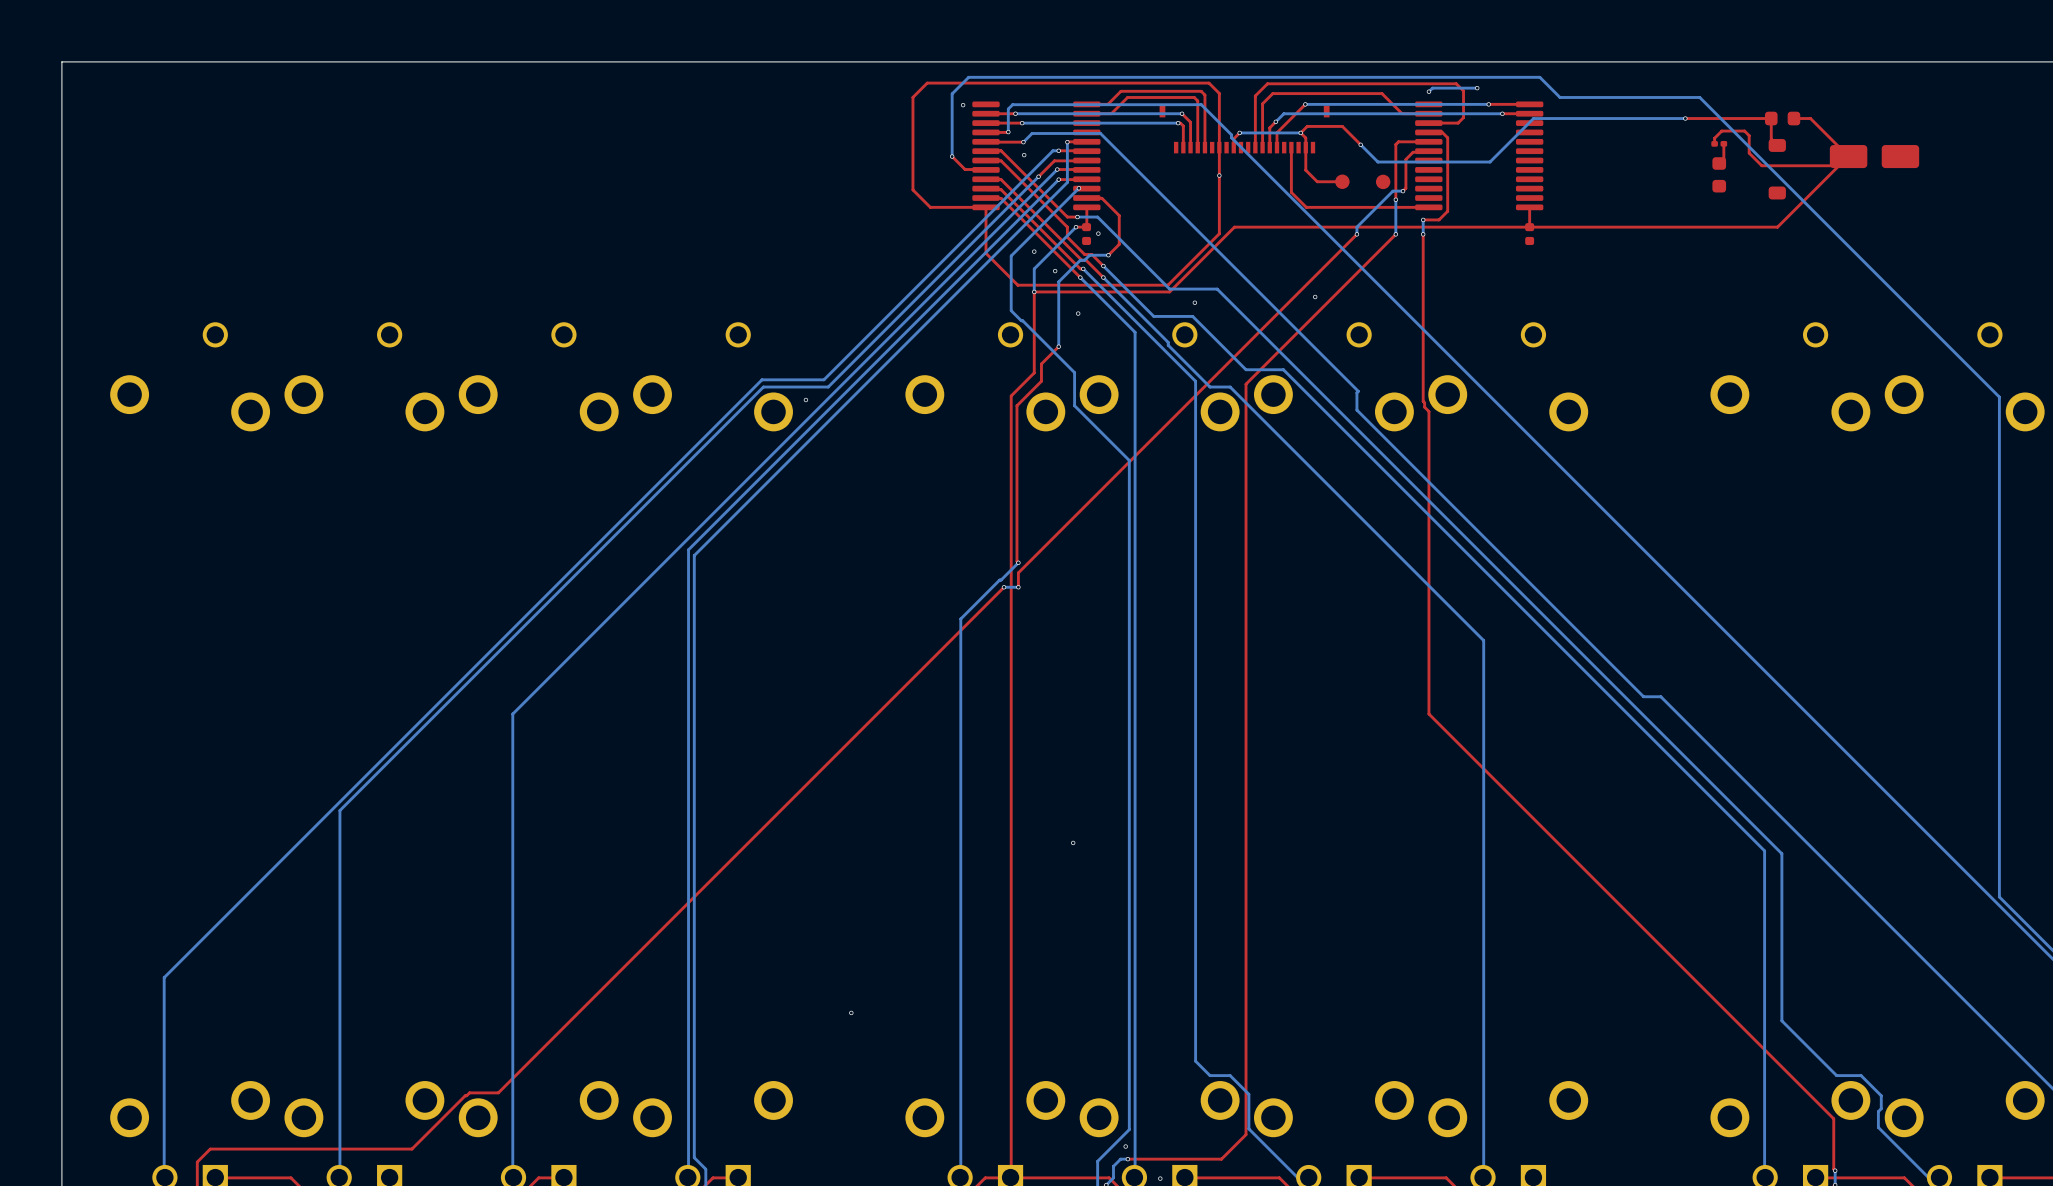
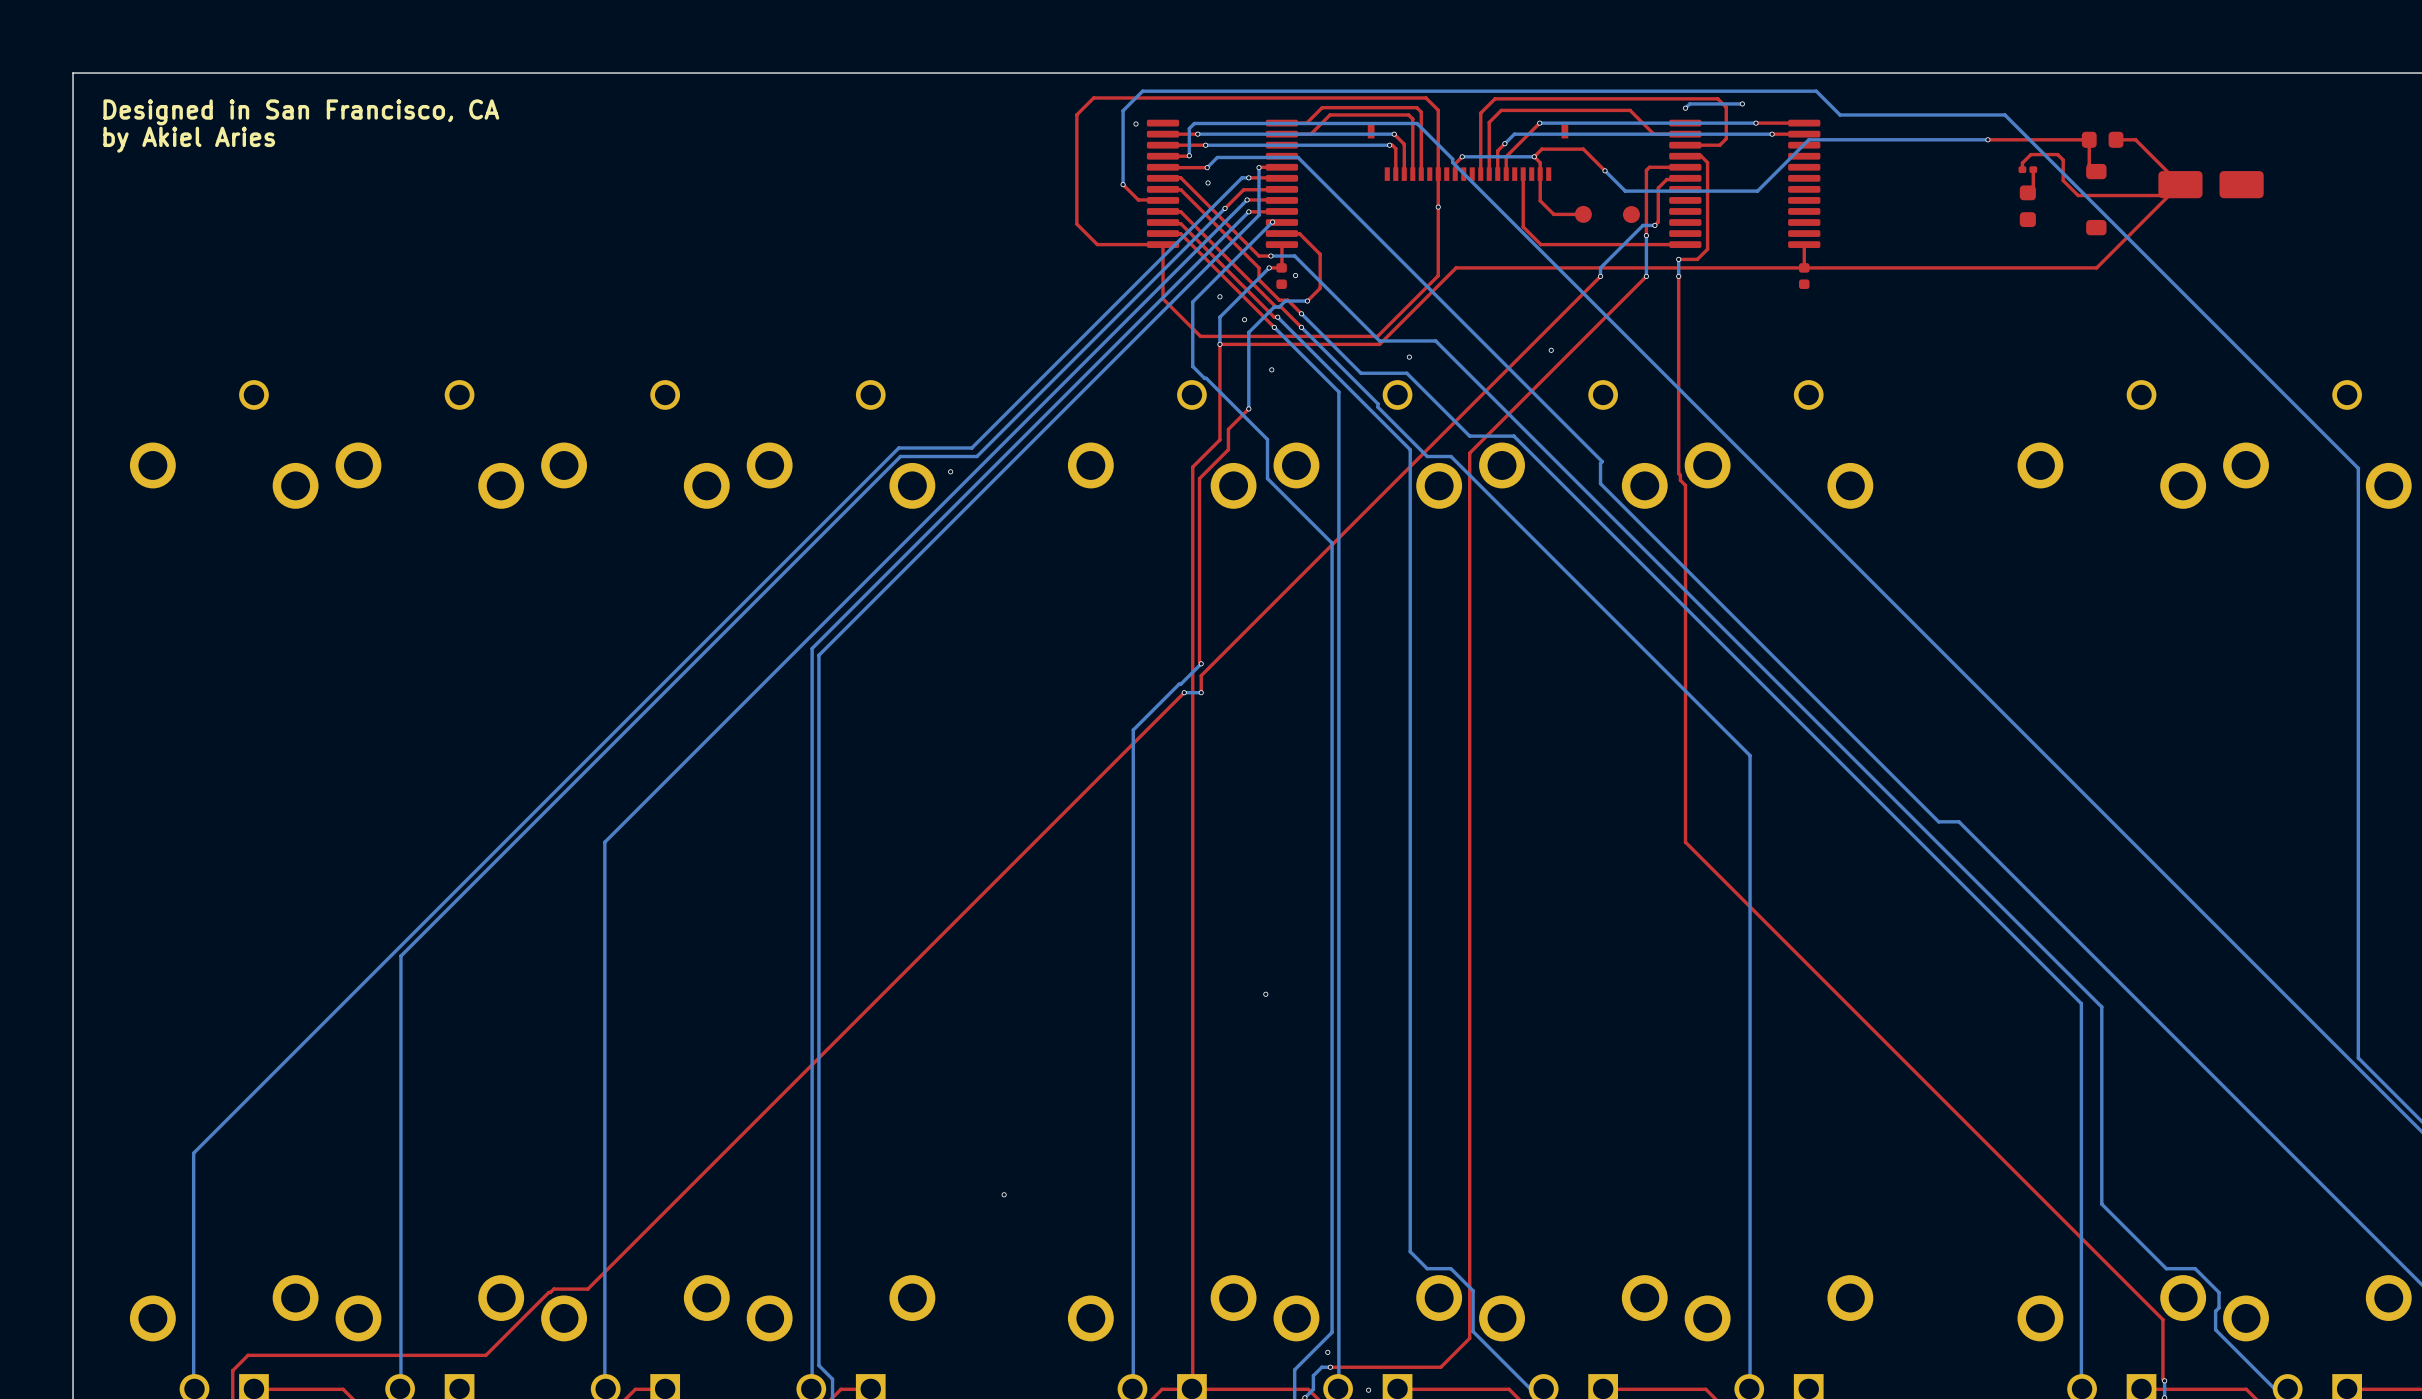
text: none -> Designed in San Francisco, CA (301, 112)
text: none -> by Akiel Aries (189, 139)

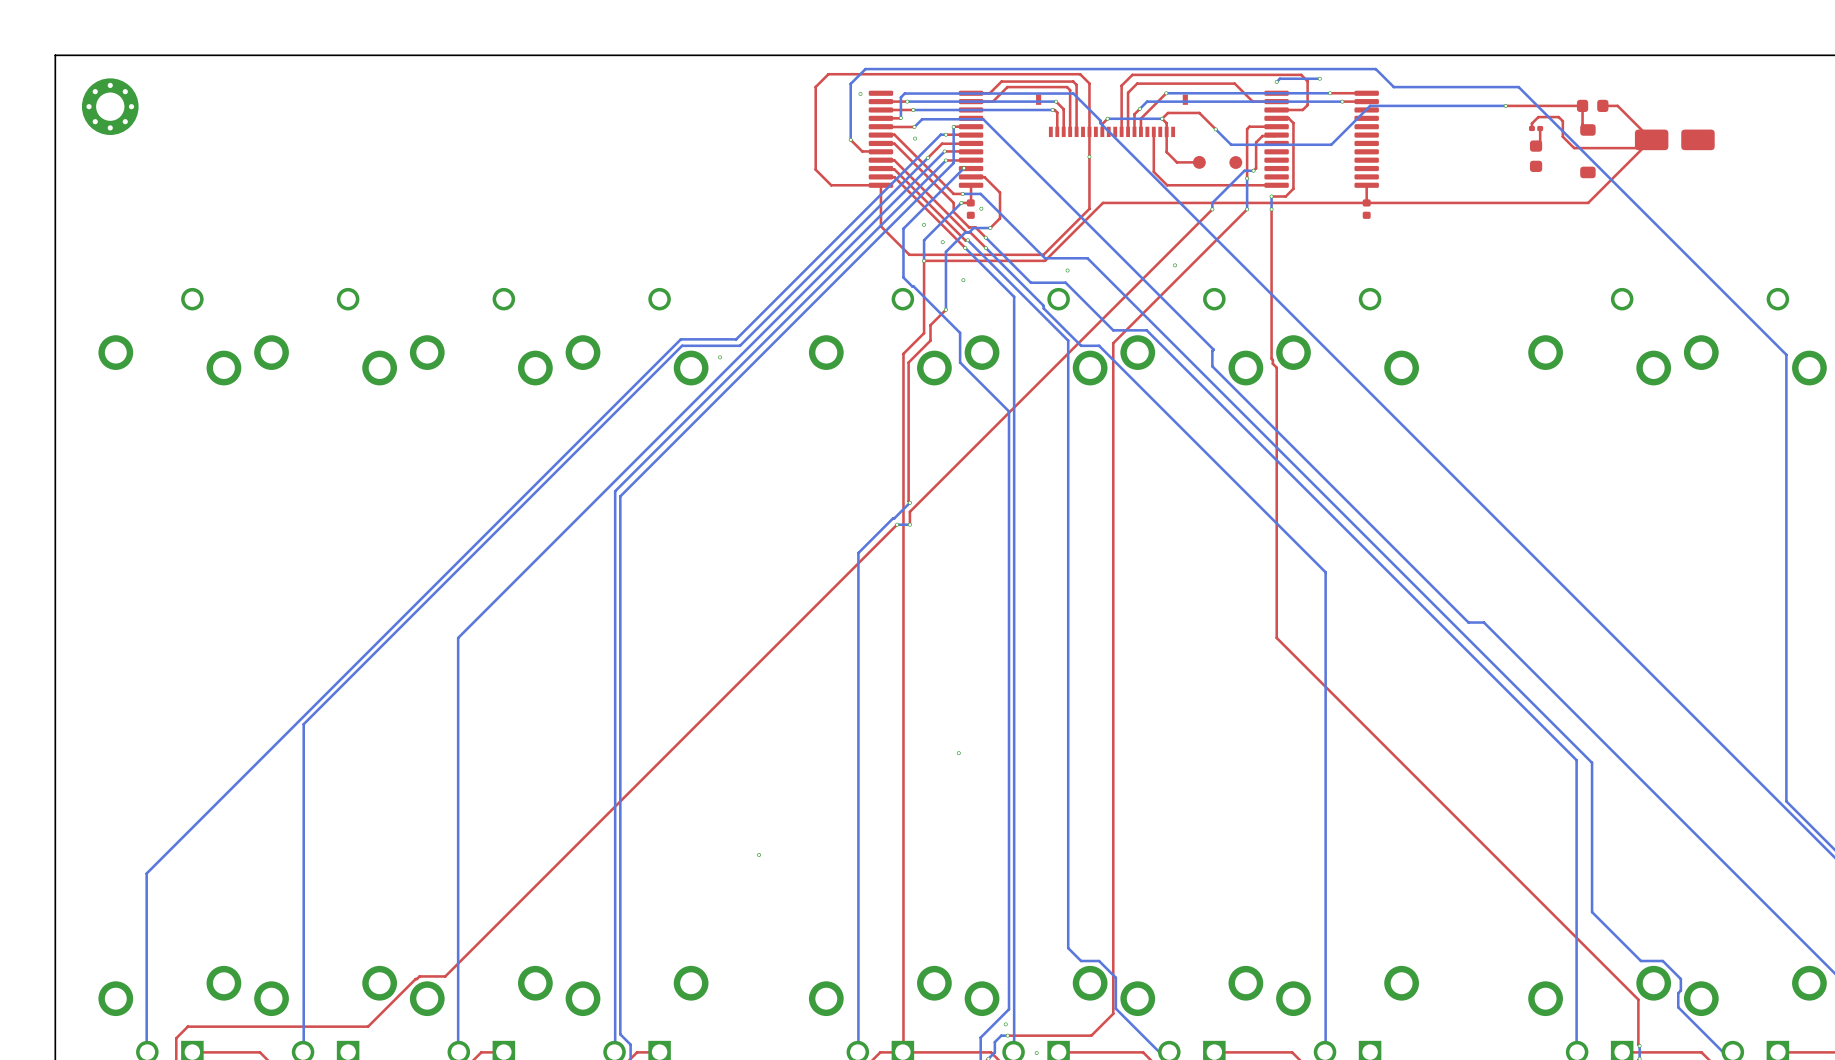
text: Designed in San Francisco, CA (301, 112) -> none
text: by Akiel Aries (189, 139) -> none
part: none -> (110, 106)
via position: (1004, 1194) -> (759, 854)

